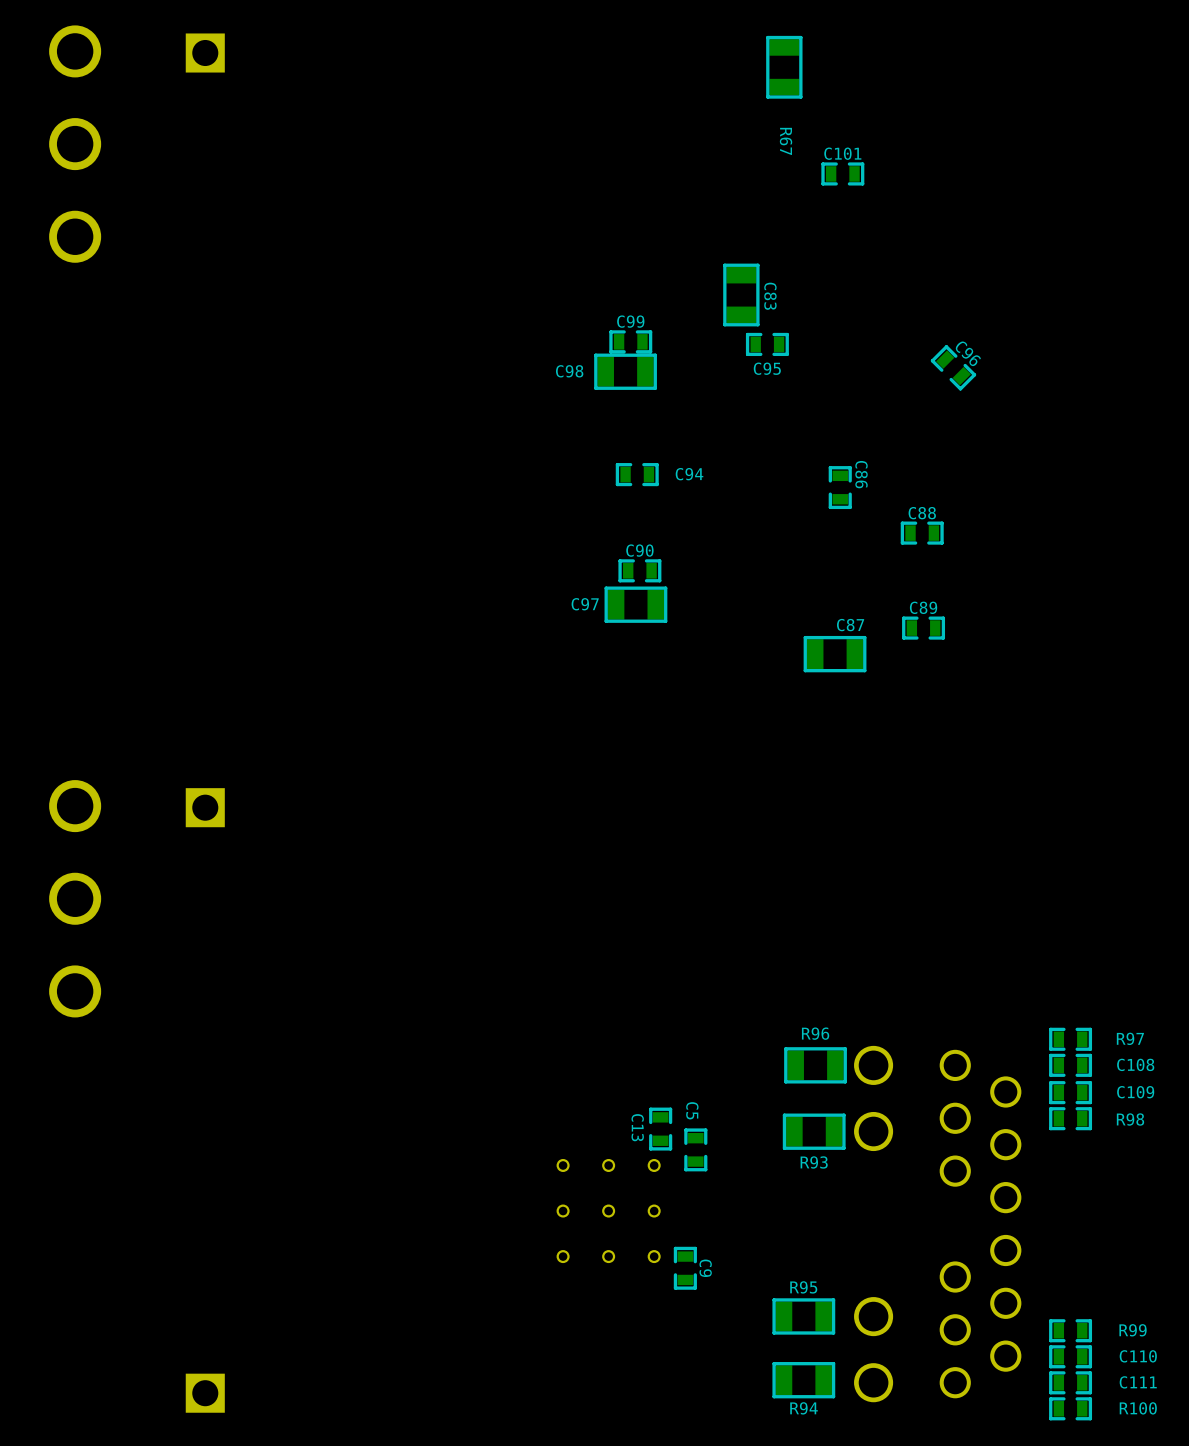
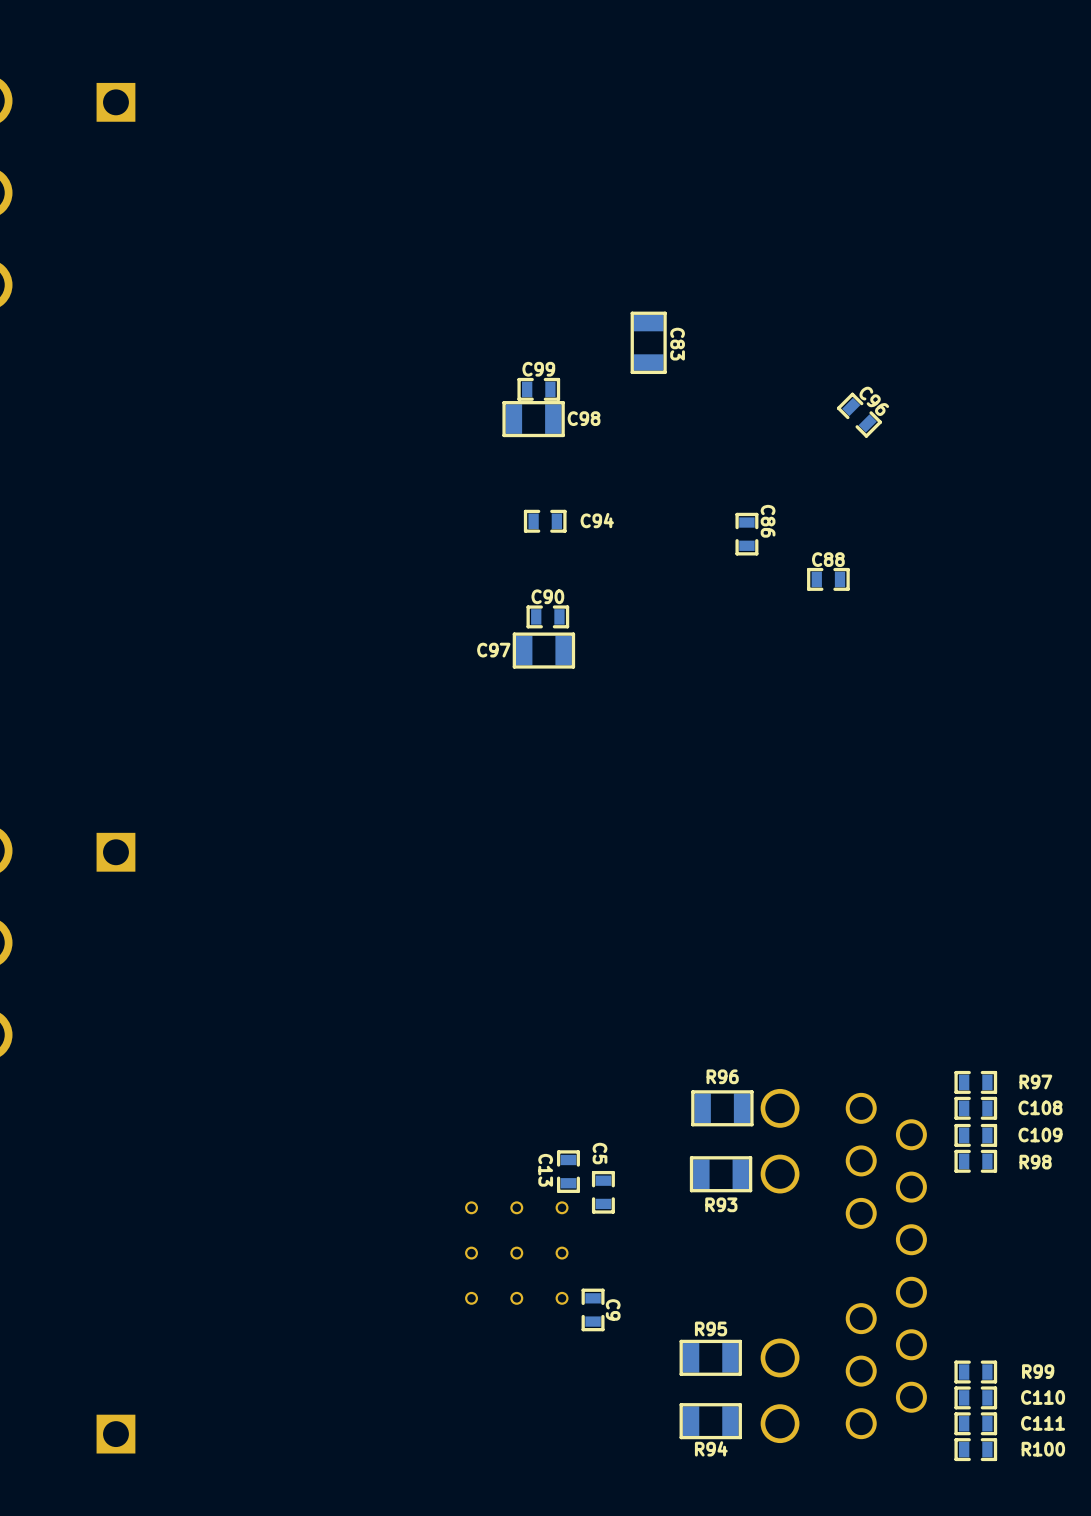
R67: (784, 67) -> none
C101: (842, 173) -> none
C95: (767, 344) -> none
C98 name position: C98 (569, 371) -> C98 (584, 418)
C89: (923, 628) -> none
C87: (835, 654) -> none

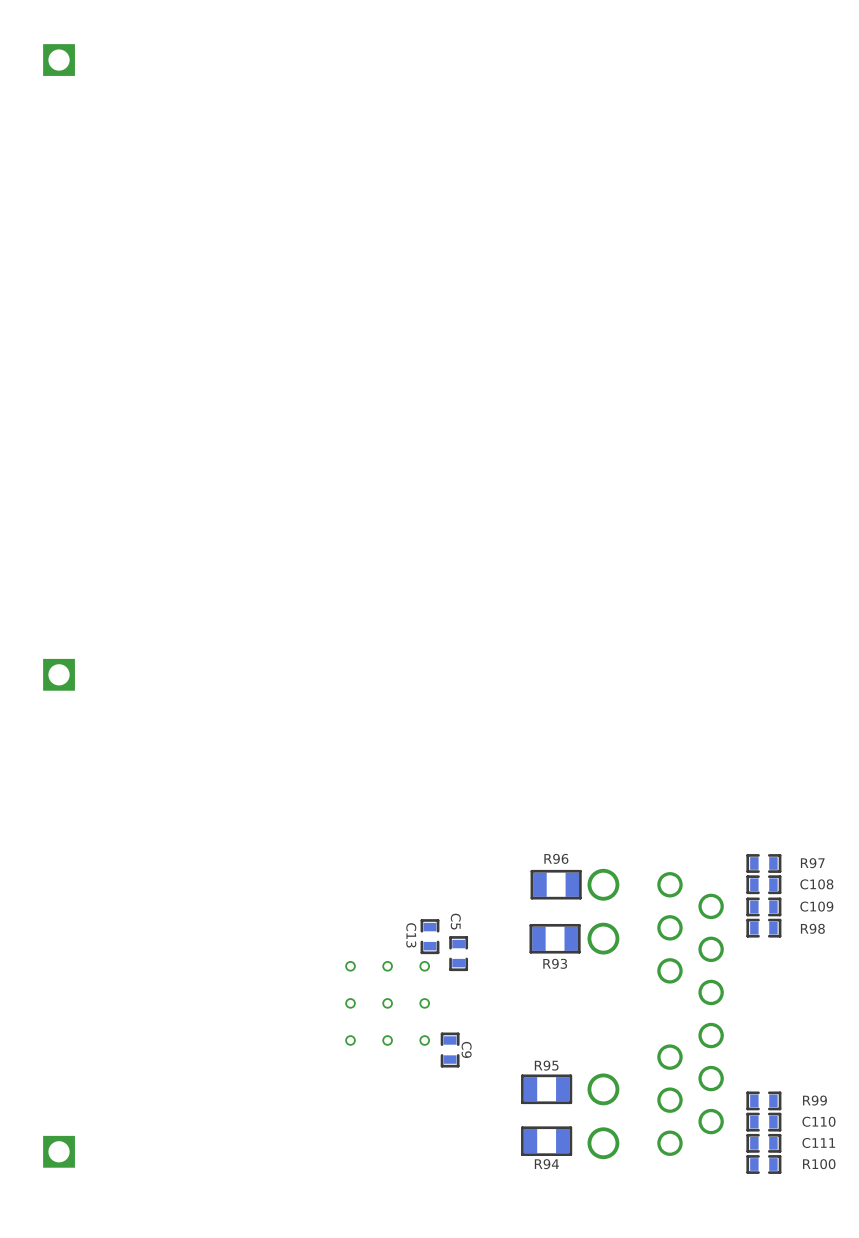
C83: (648, 342) -> none
C99: (538, 389) -> none
C96: (859, 415) -> none
C98: (533, 419) -> none
C94: (545, 521) -> none
C86: (746, 534) -> none
C88: (828, 579) -> none
C90: (547, 616) -> none
C97: (543, 650) -> none

